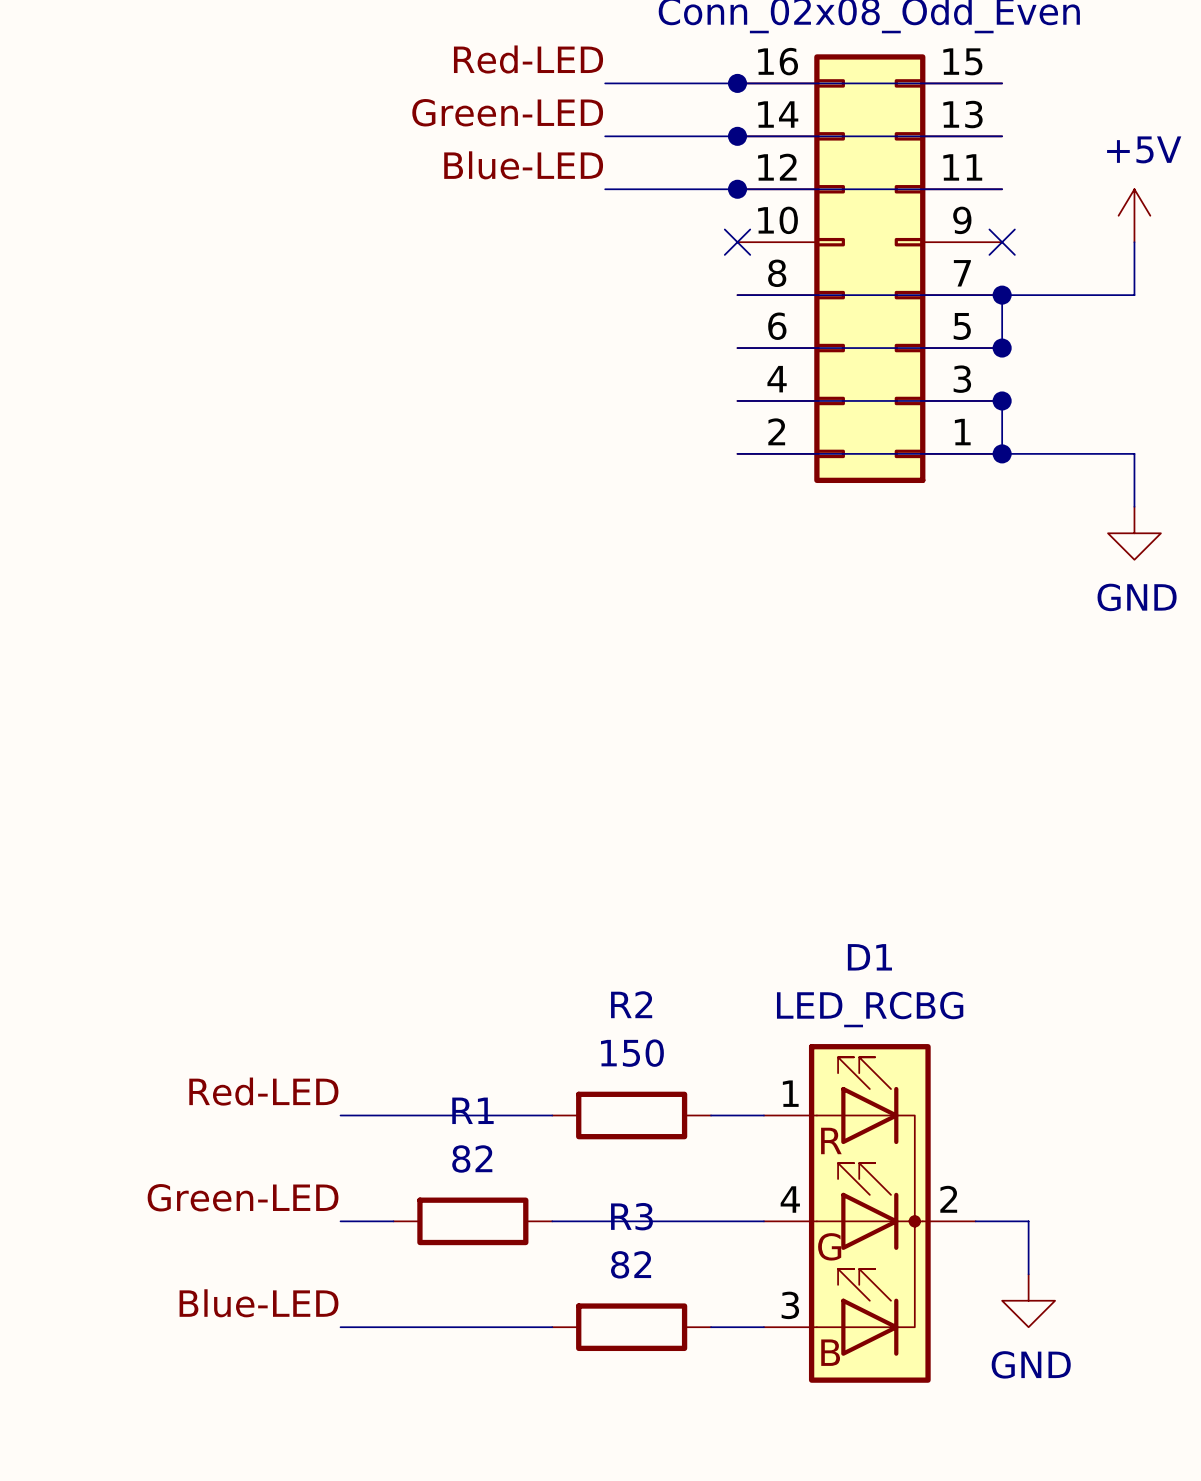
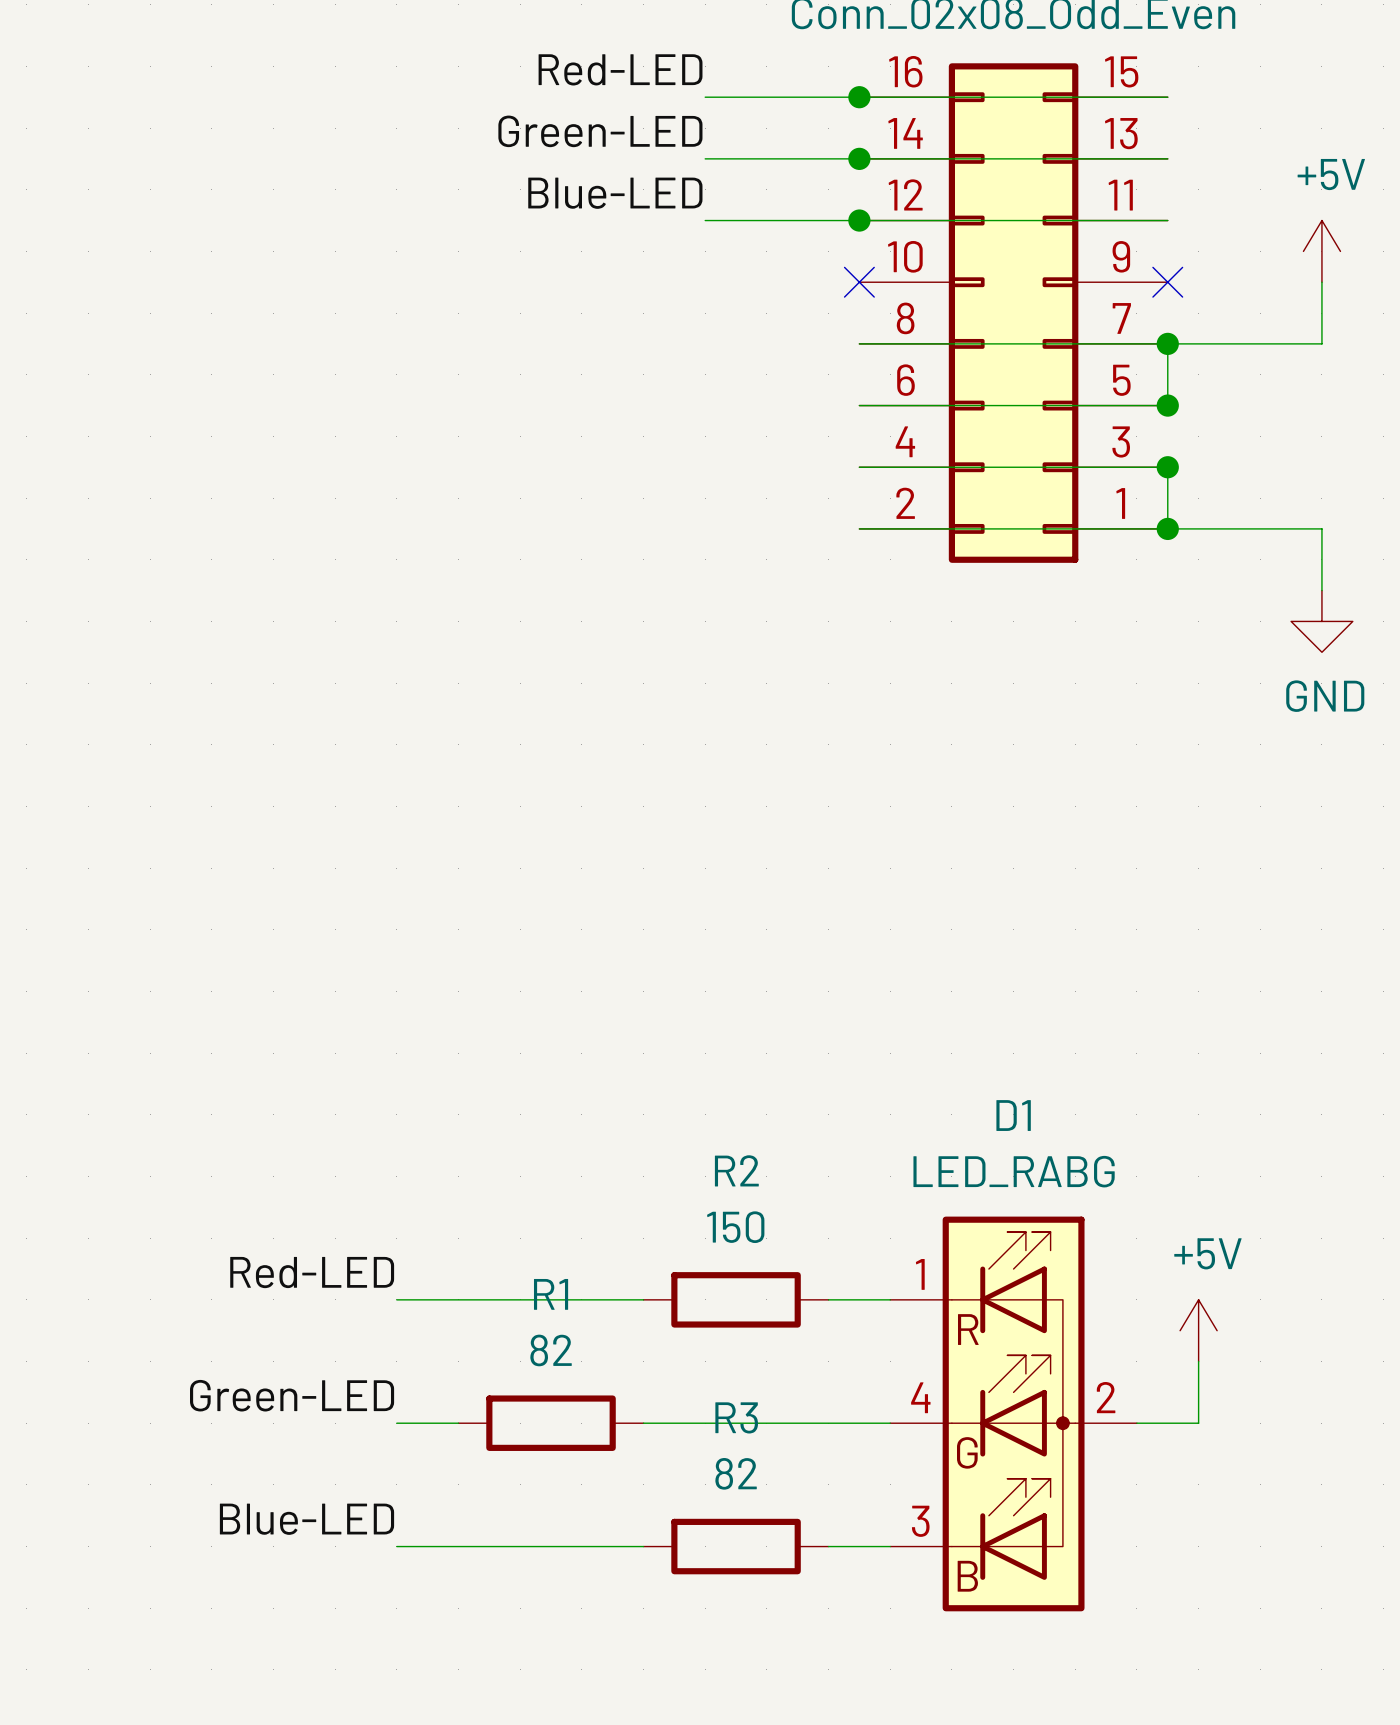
D1 value: LED_RCBG (870, 1009) -> LED_RABG (1014, 1171)
D1 symbol: [763, 1044, 976, 1383] -> [890, 1216, 1137, 1612]
power symbol: none -> +5V (1198, 1330)
wire: (1028, 1221) (1028, 1274) -> (1198, 1423) (1198, 1361)
power symbol: GND (1028, 1300) -> none

